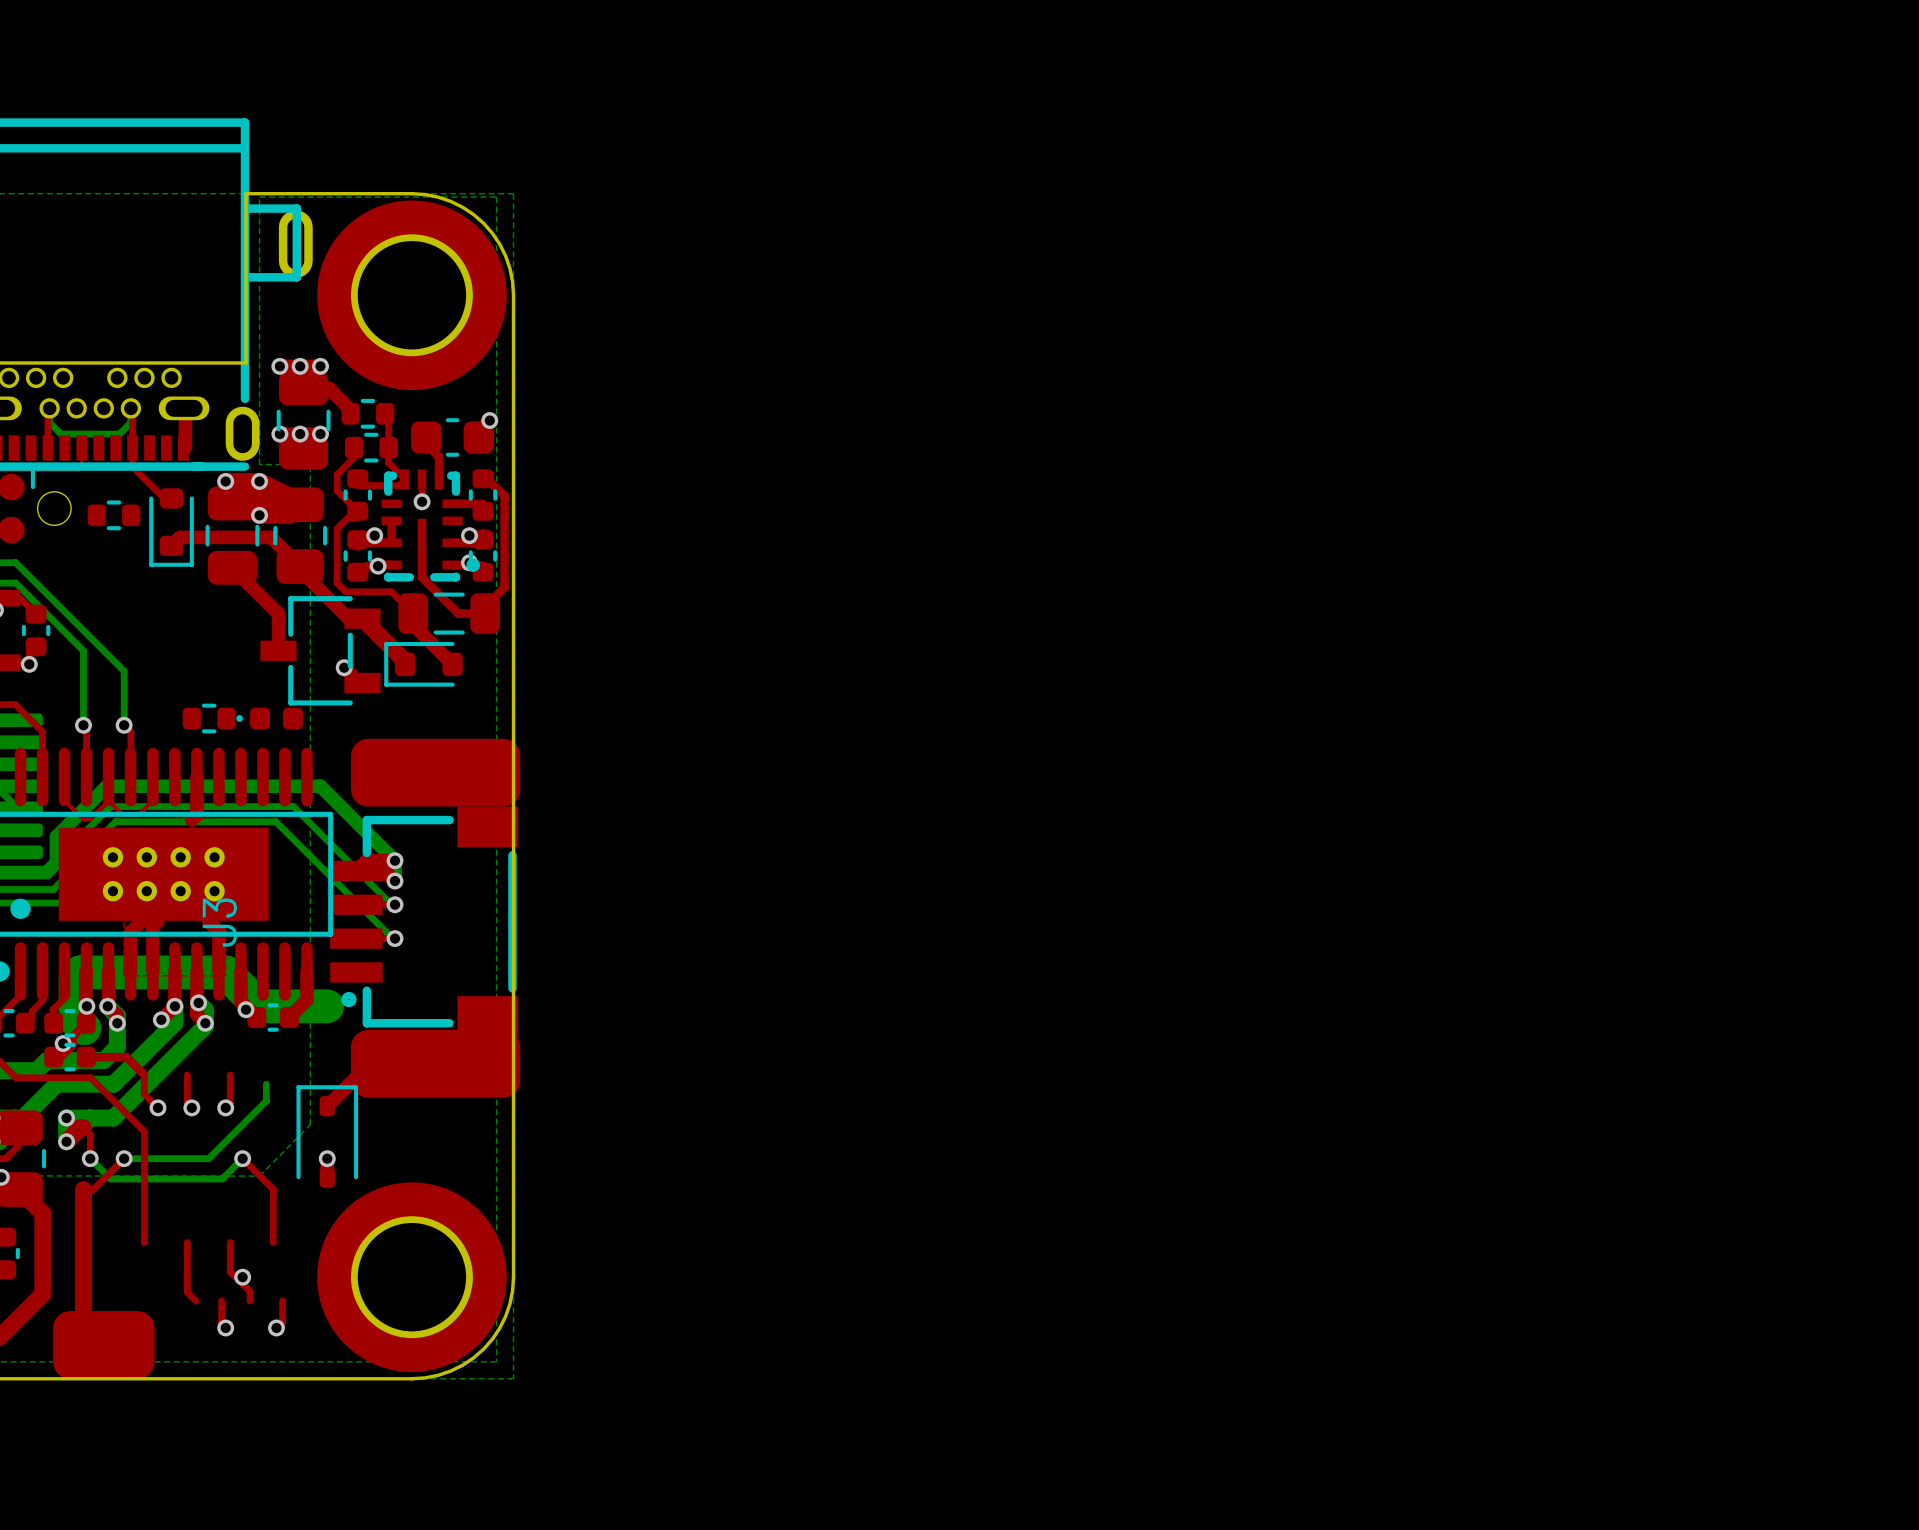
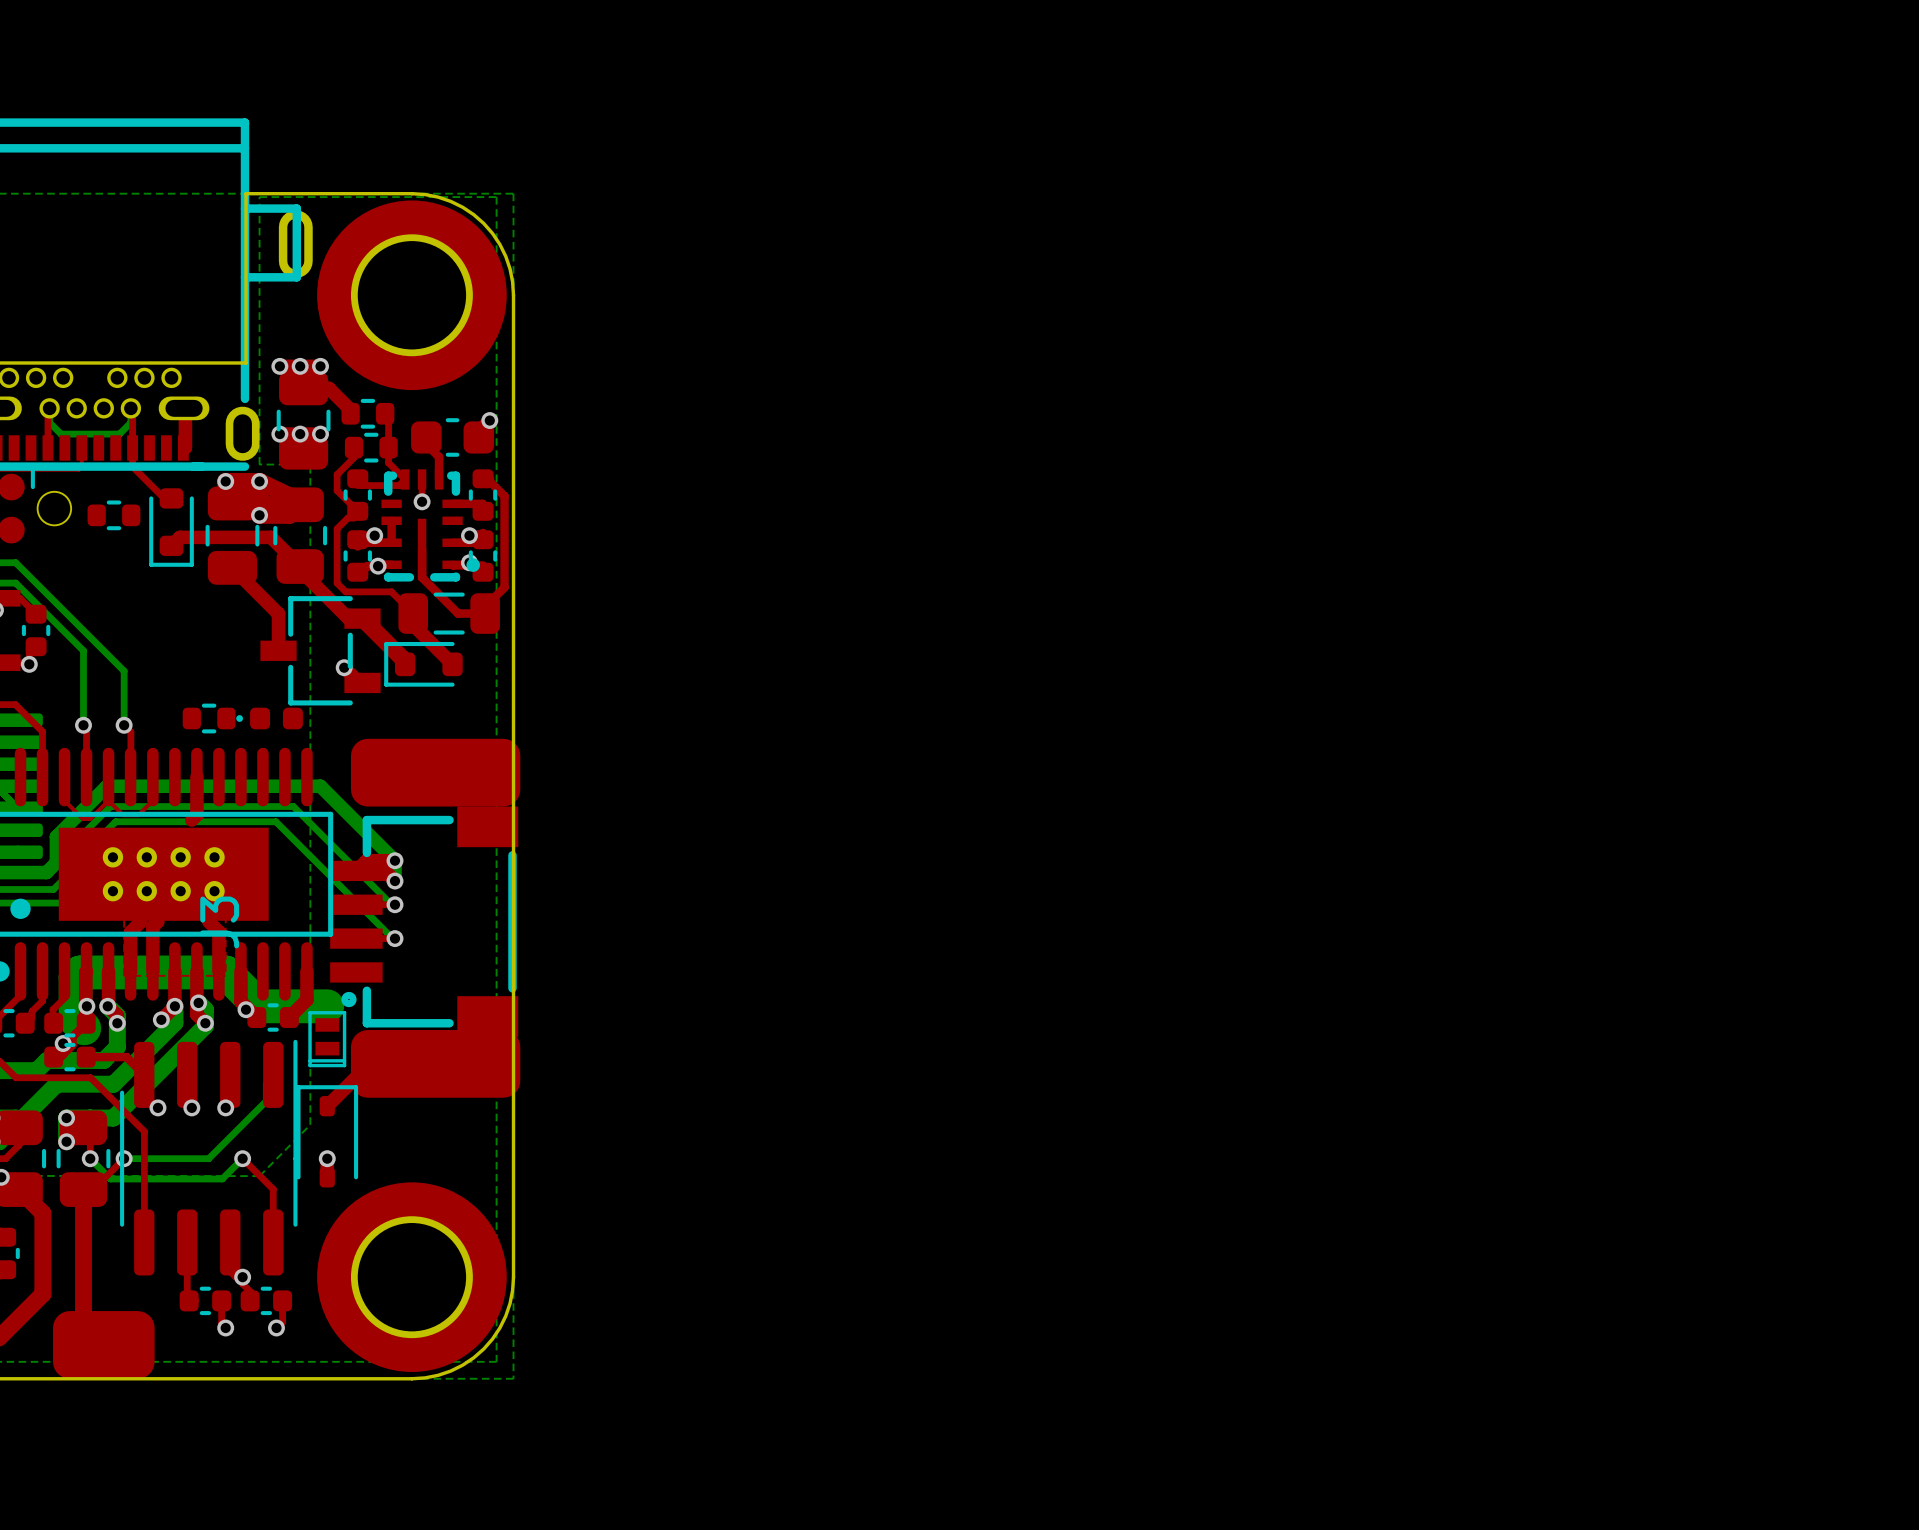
part: none -> (327, 1039)
part: none -> (208, 1157)
part: none -> (83, 1158)
part: none -> (205, 1300)
part: none -> (266, 1300)

